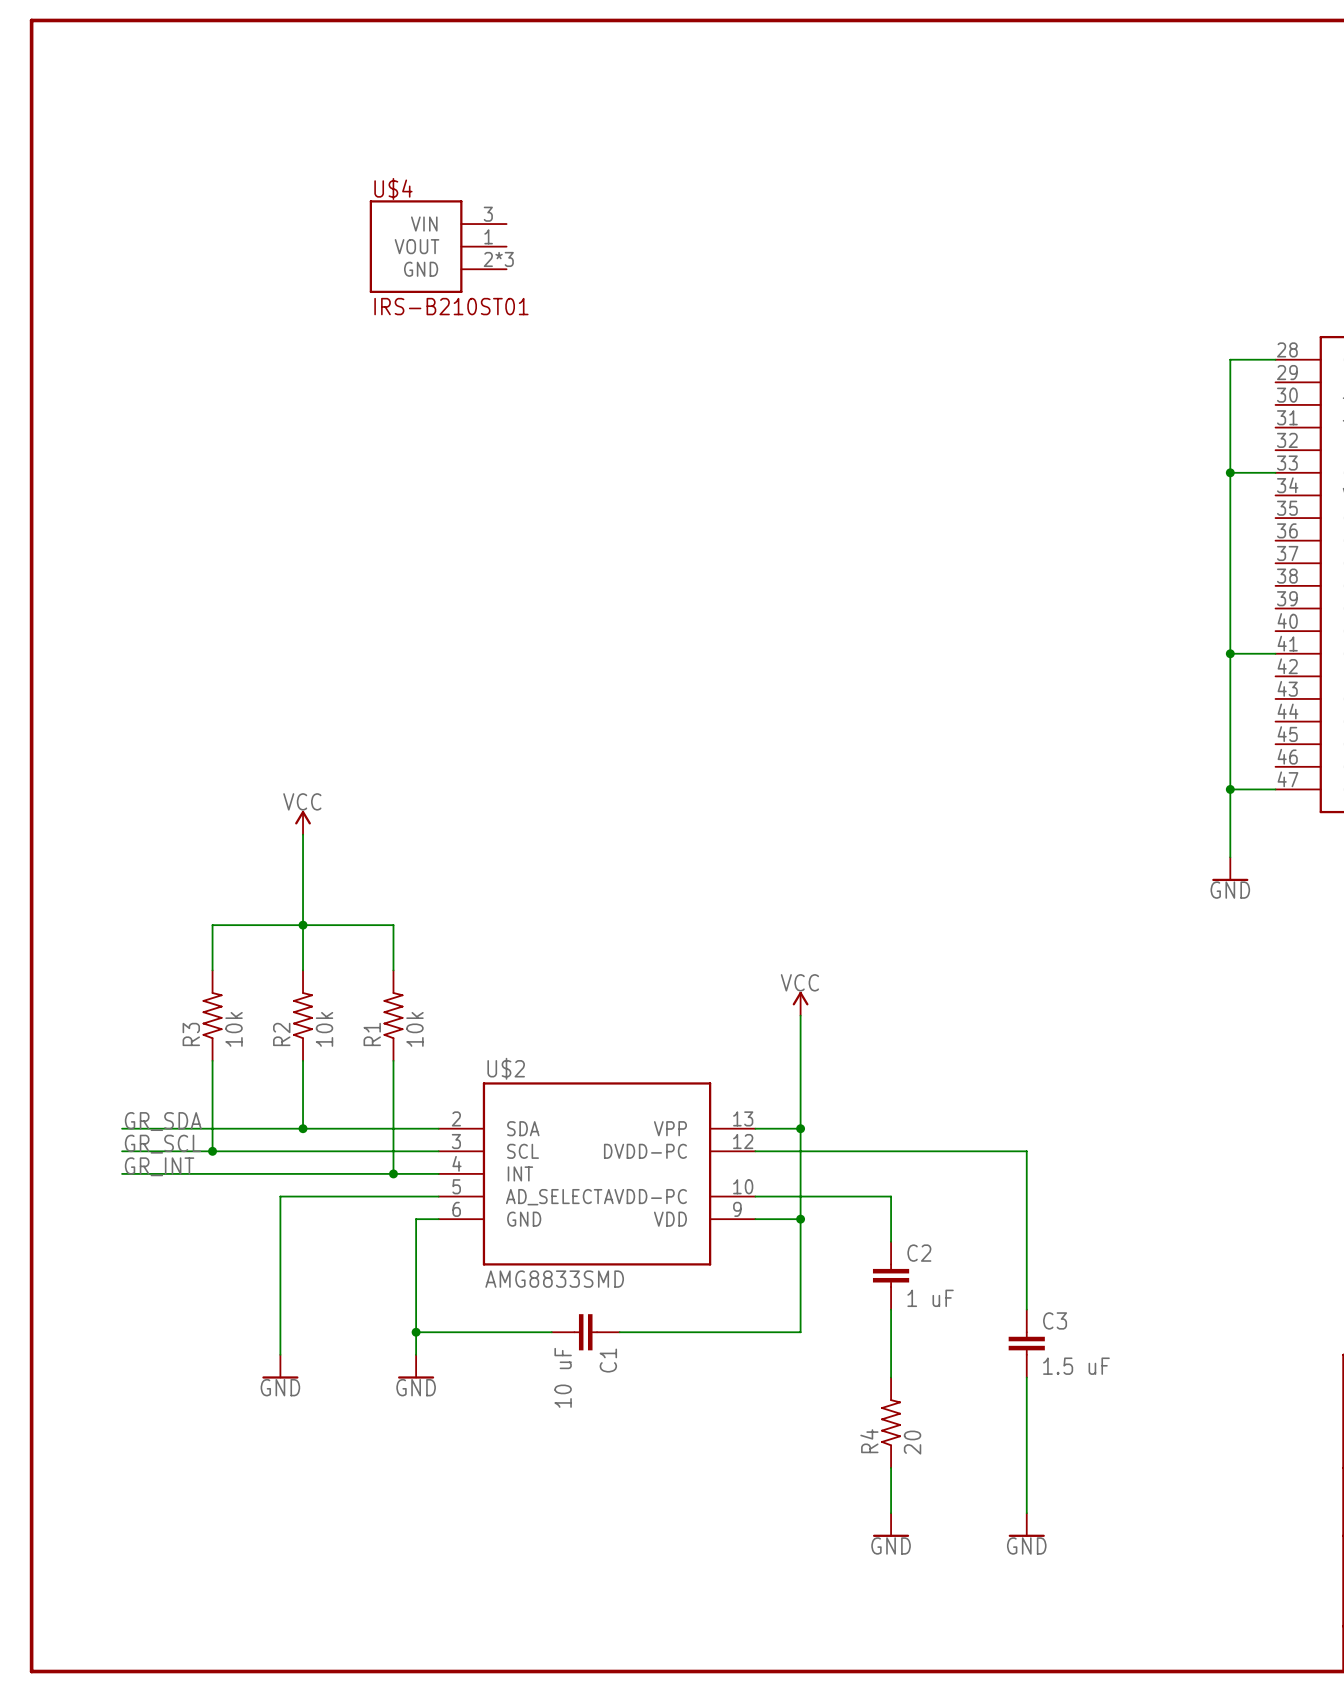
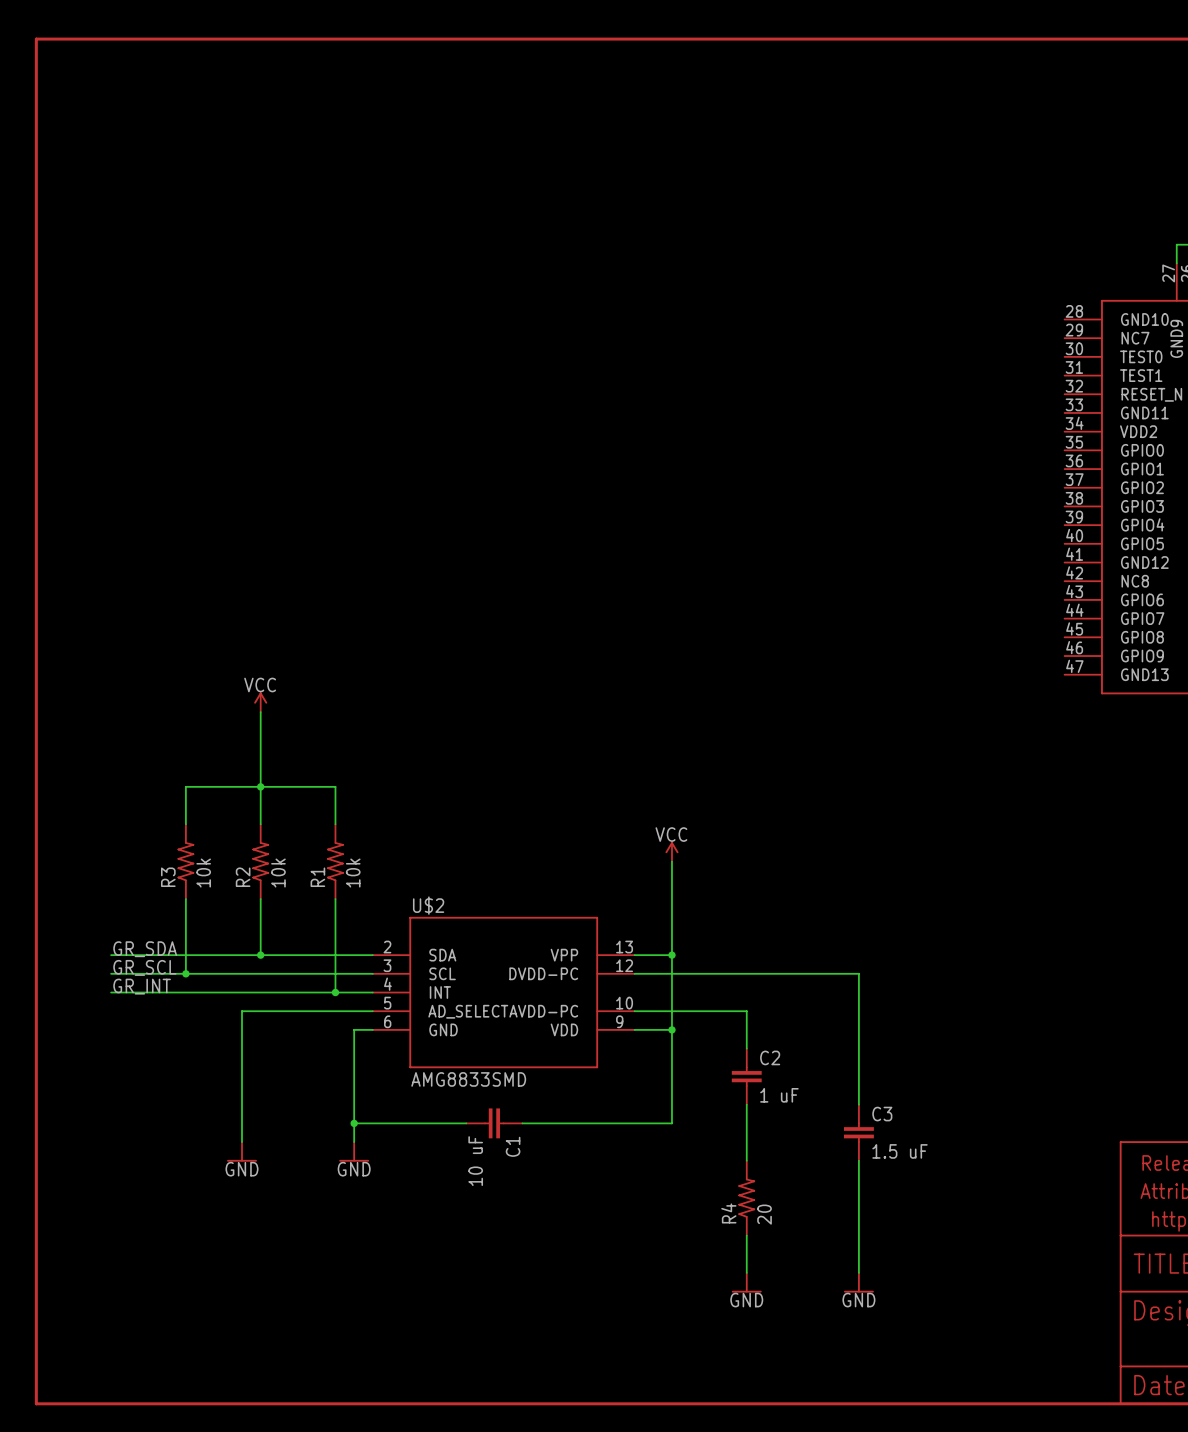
U$4: IRS-B210ST01 (438, 246) -> none
wire: (1275, 359) (1230, 359) (1230, 857) -> none
wire: (1230, 472) (1275, 472) -> none
junction: (1230, 472) -> none
wire: (1230, 653) (1275, 653) -> none
junction: (1230, 653) -> none
wire: (1230, 789) (1275, 789) -> none
junction: (1230, 789) -> none
power symbol: GND (1230, 869) -> none

